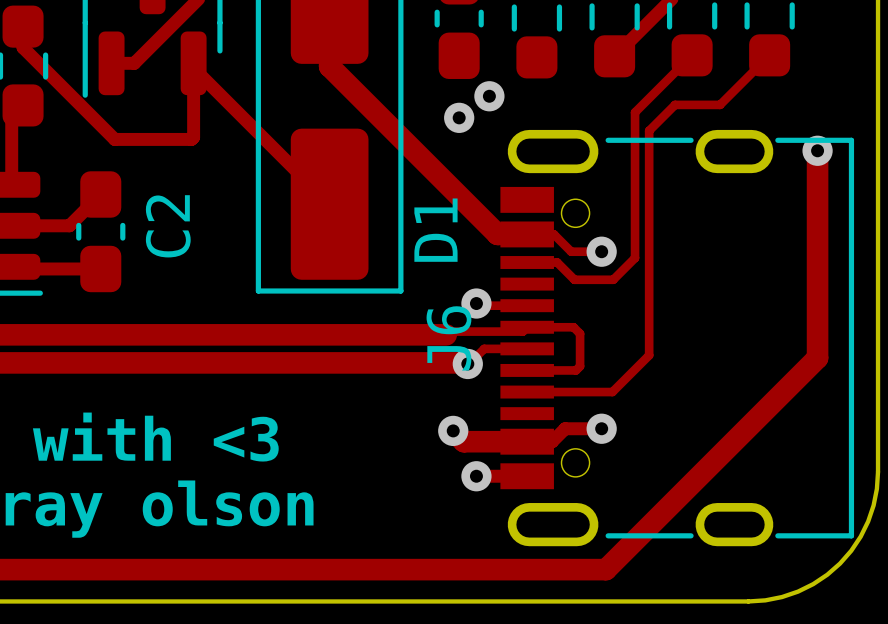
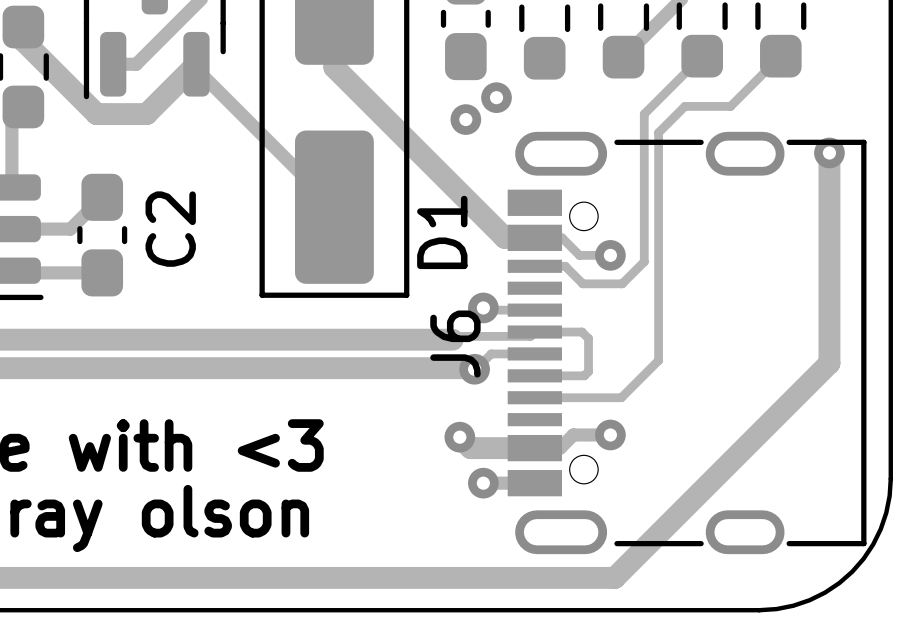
track: (23, 40) (23, 47) (114, 139) (191, 139) (193, 137) (193, 68) -> (23, 40) (96, 114) (146, 114) (196, 64)

